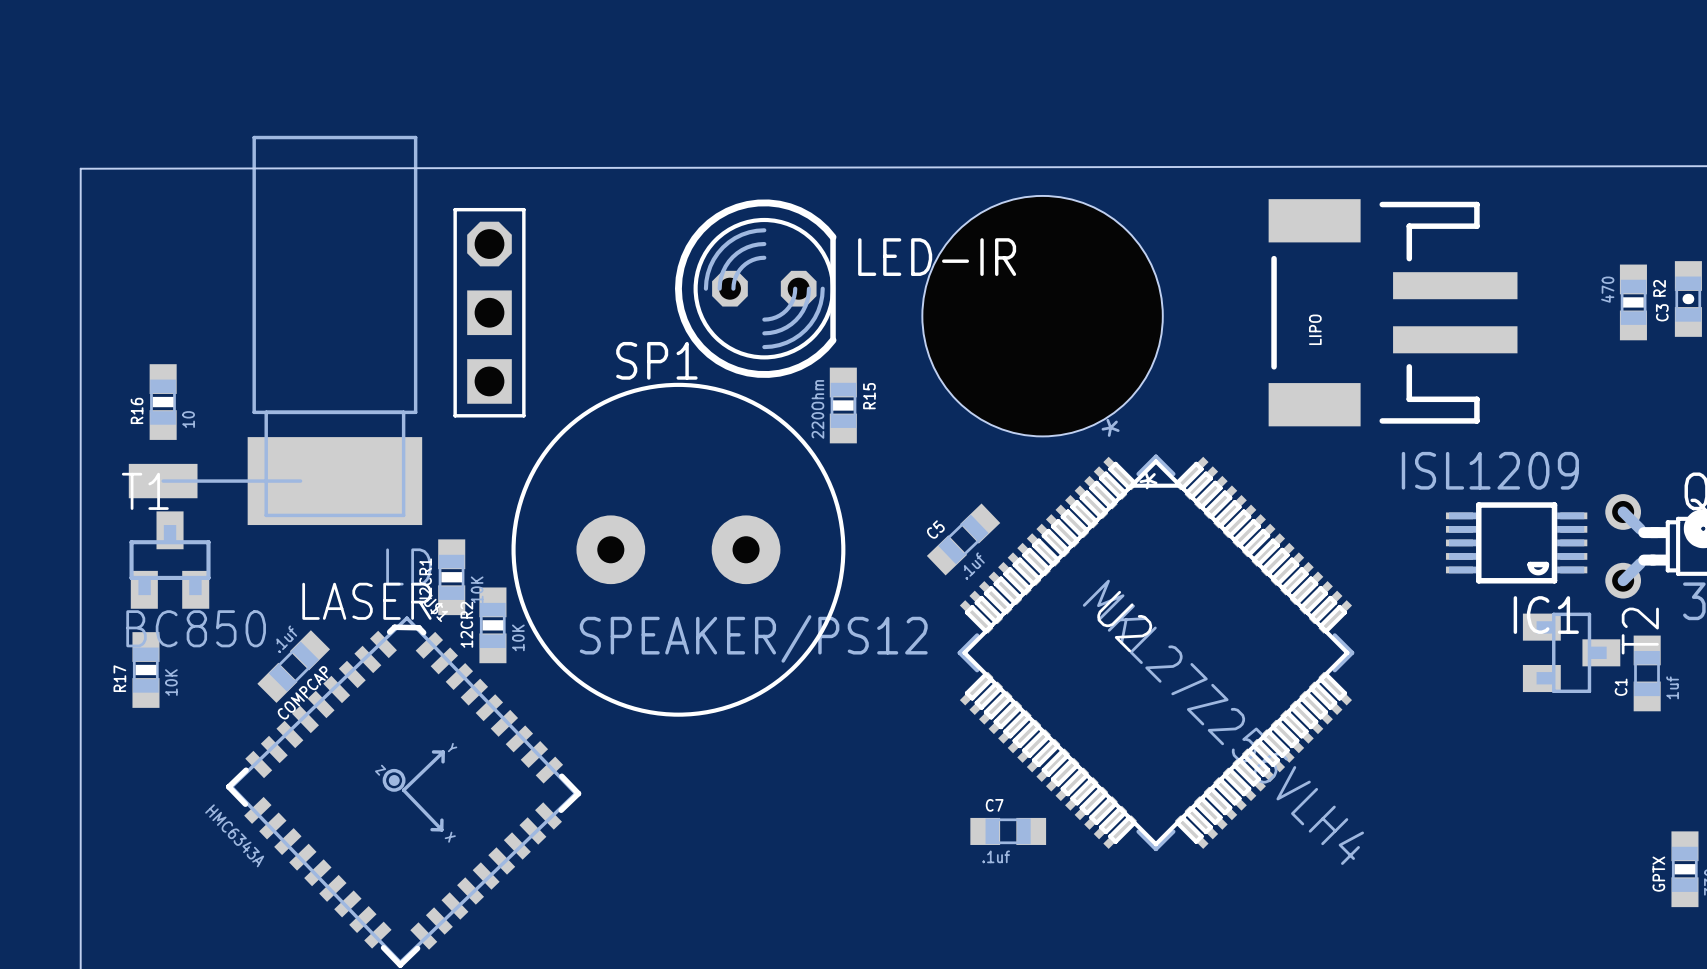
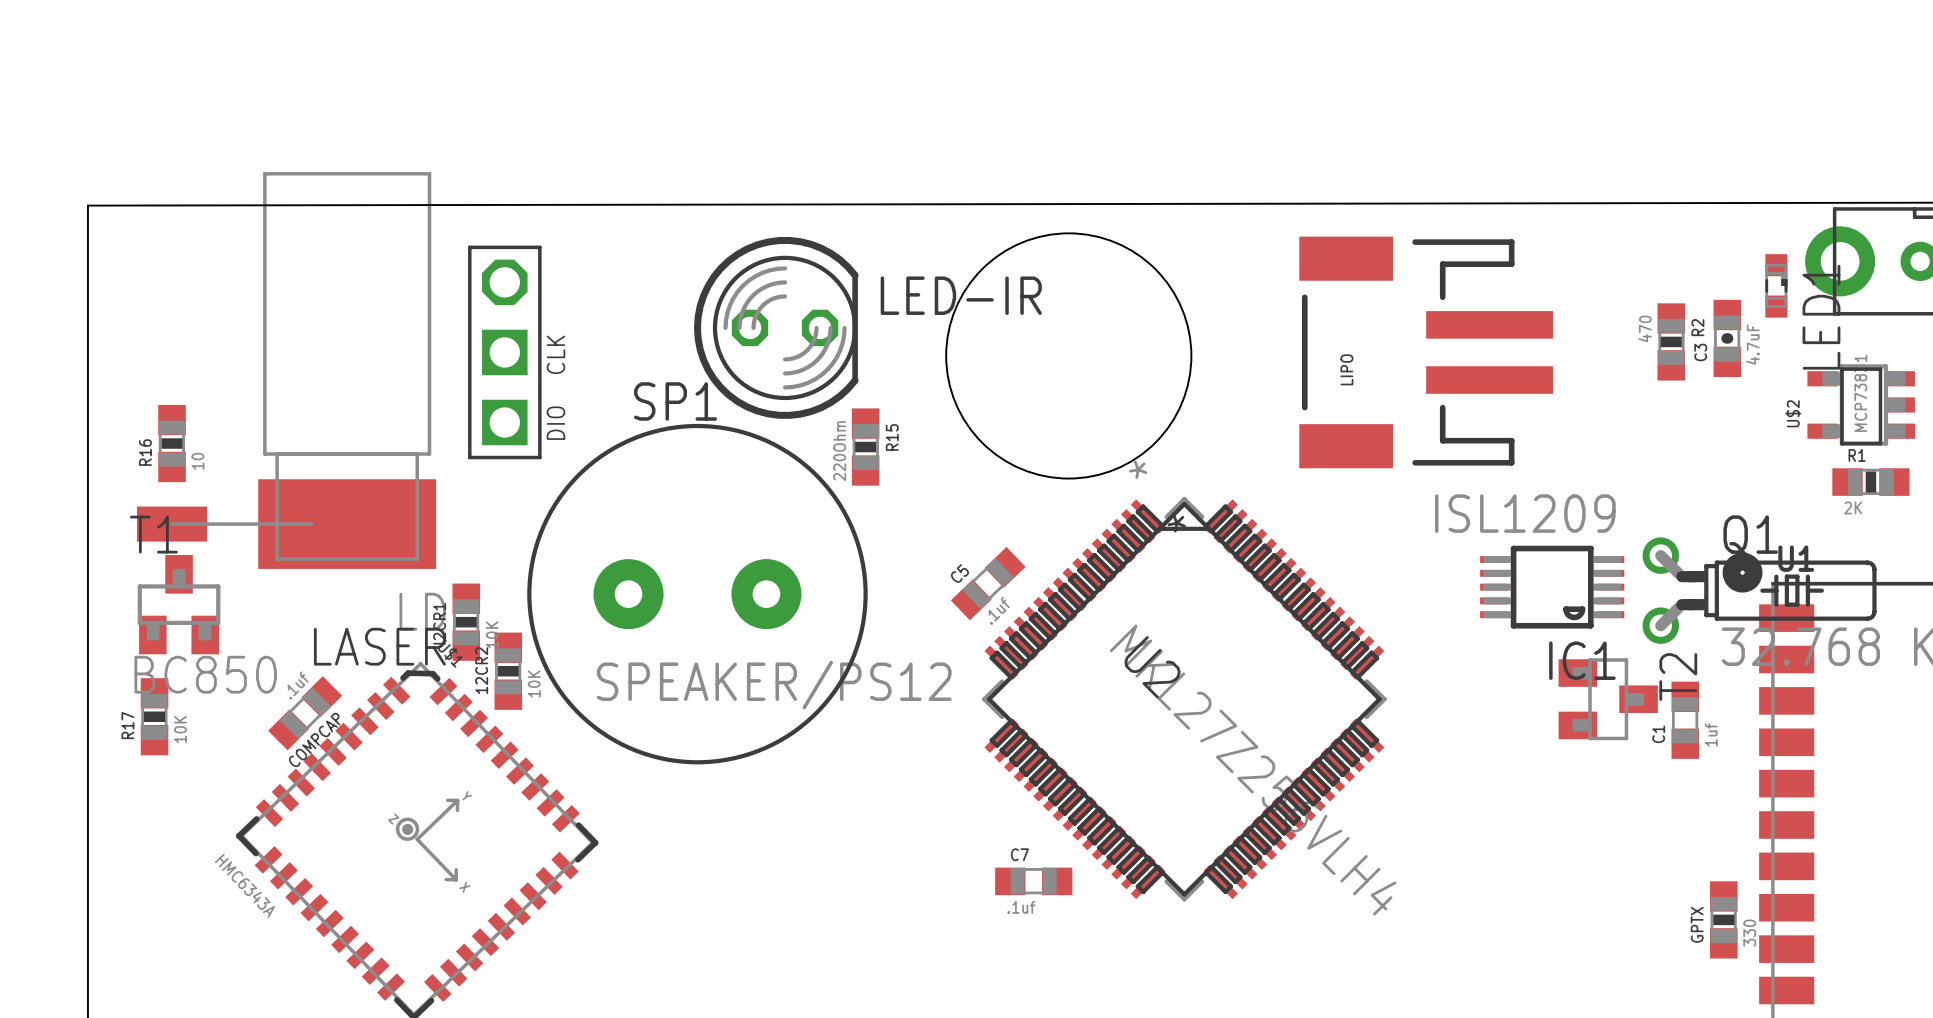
part text: none -> CLK (555, 354)
part text: none -> DIO (555, 423)

